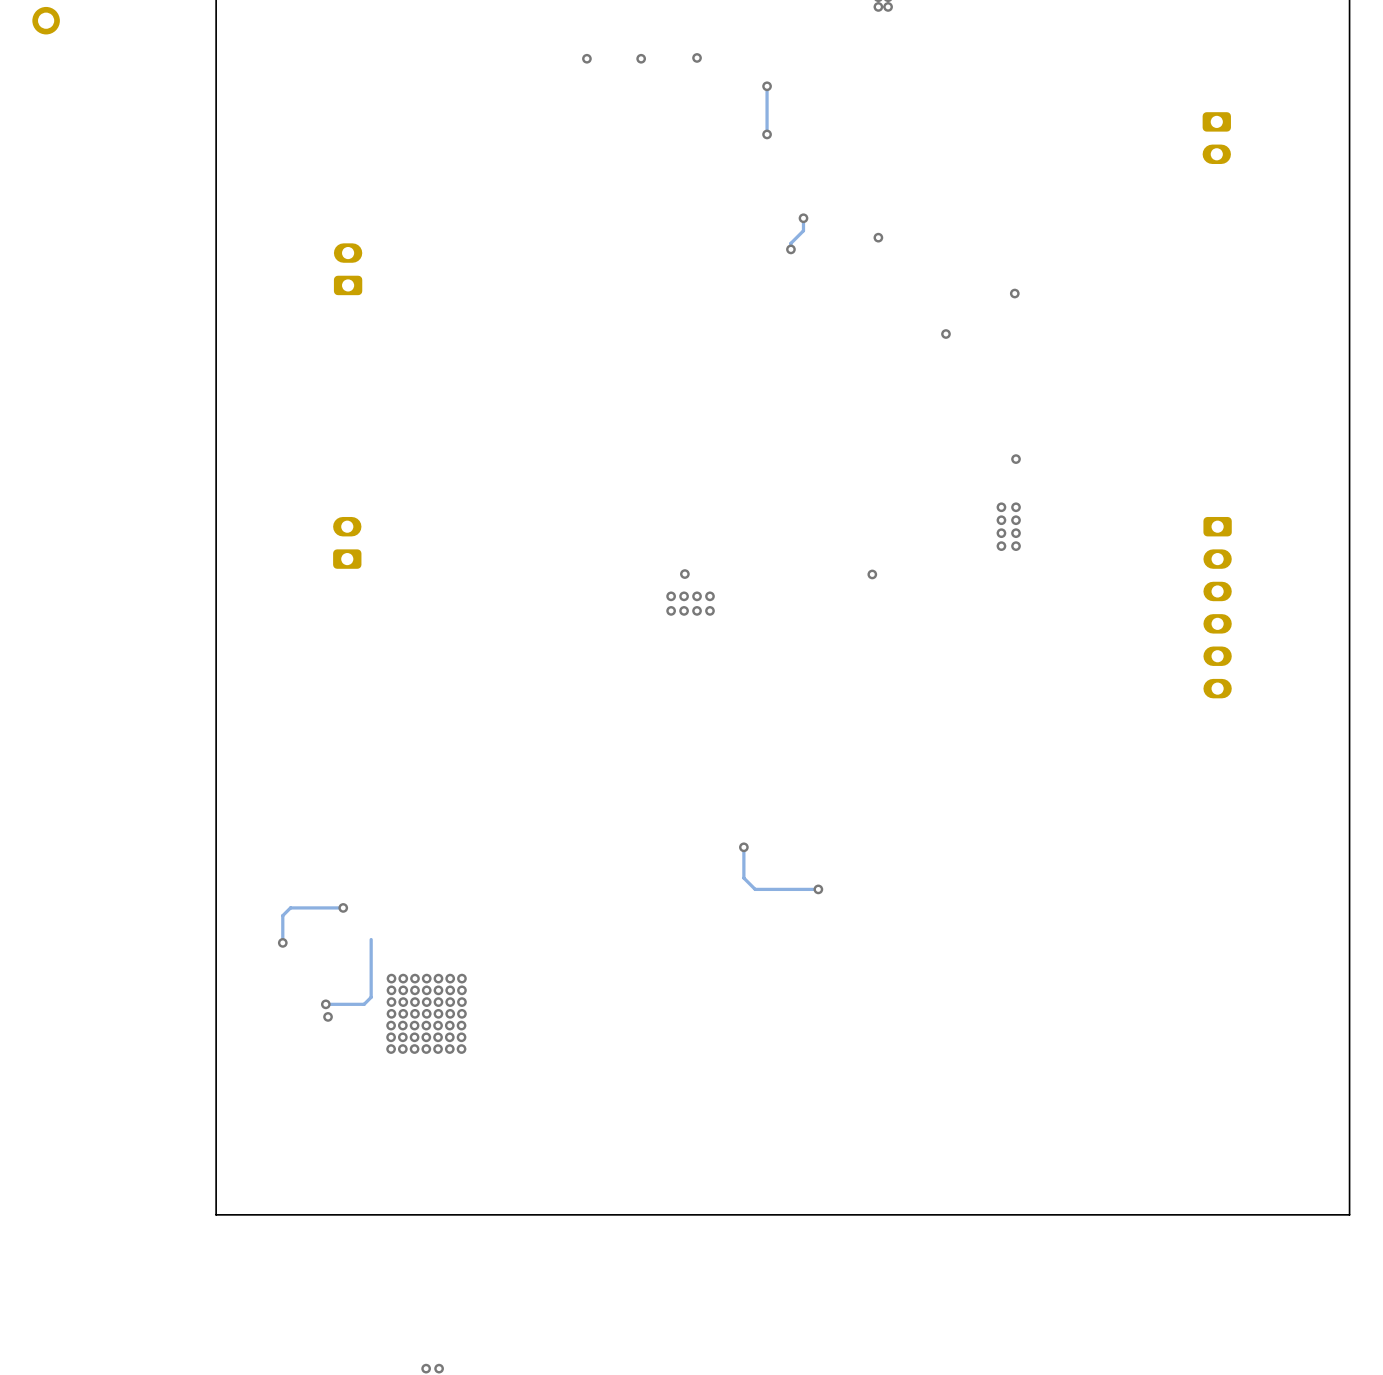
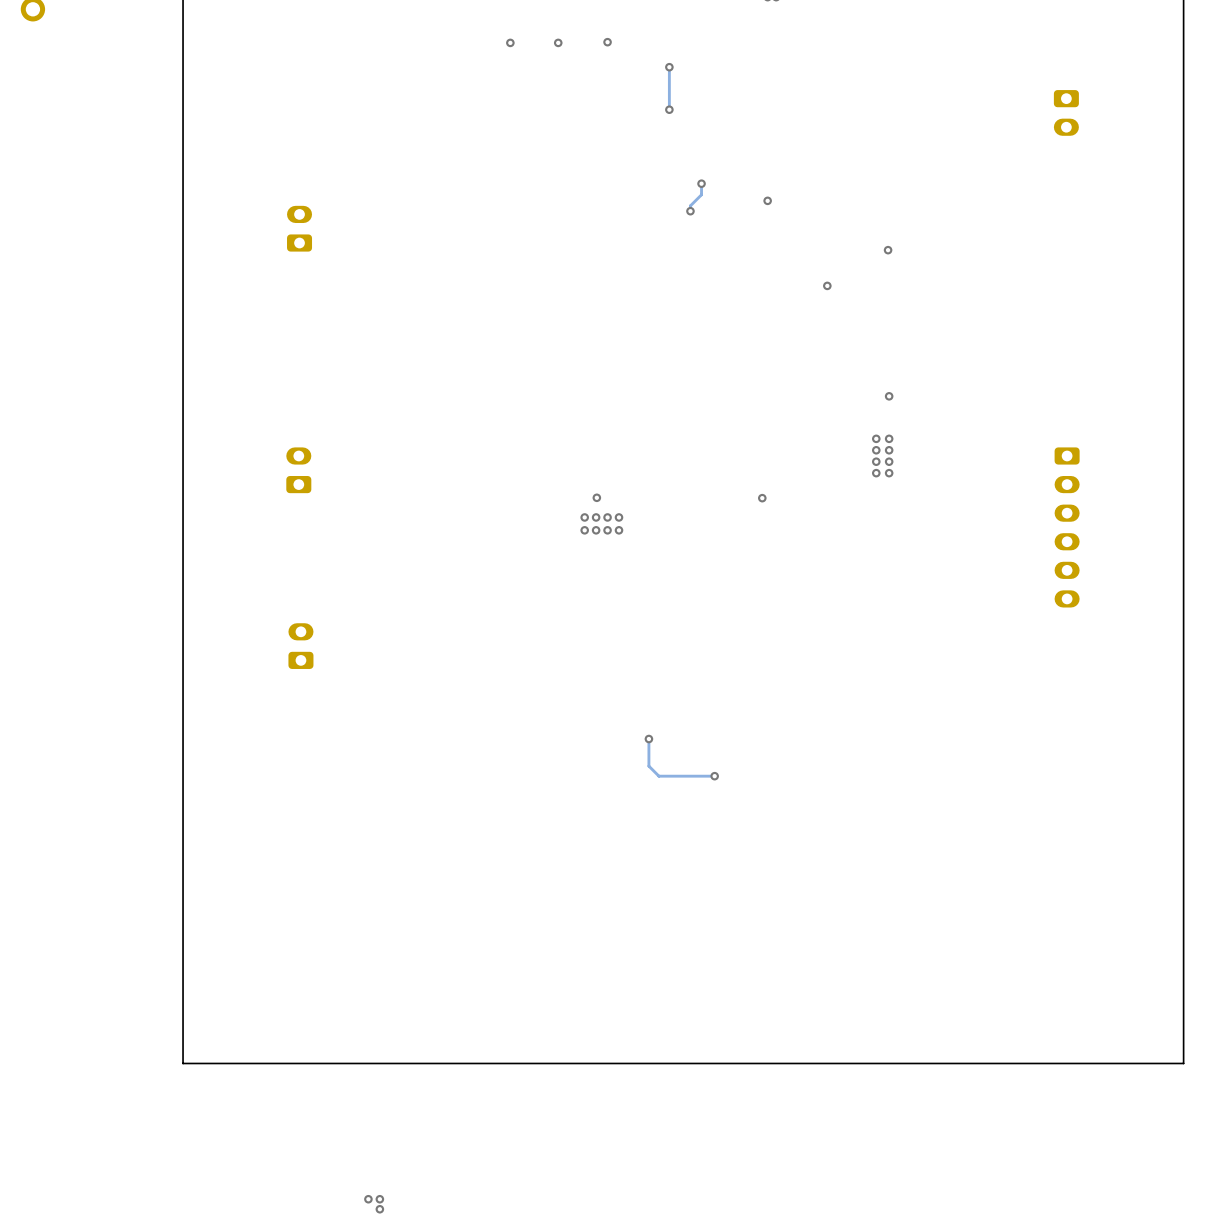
part: none -> (300, 646)
track: (343, 907) (290, 907) (282, 915) (282, 942) -> none
via: (343, 907) -> none
track: (371, 939) (371, 997) (364, 1004) (325, 1004) -> none
via: (282, 942) -> none
via: (391, 978) -> none
via: (403, 978) -> none
via: (414, 978) -> none
via: (426, 978) -> none
via: (438, 978) -> none
via: (450, 978) -> none
via: (461, 978) -> none
via: (391, 990) -> none
via: (403, 990) -> none
via: (414, 990) -> none
via: (426, 990) -> none
via: (438, 990) -> none
via: (450, 990) -> none
via: (461, 990) -> none
via: (391, 1002) -> none
via: (403, 1002) -> none
via: (414, 1002) -> none
via: (426, 1002) -> none
via: (438, 1002) -> none
via: (450, 1002) -> none
via: (461, 1002) -> none
via: (325, 1004) -> none
via: (391, 1013) -> none
via: (403, 1013) -> none
via: (414, 1013) -> none
via: (426, 1013) -> none
via: (438, 1013) -> none
via: (450, 1013) -> none
via: (461, 1013) -> none
via: (328, 1016) -> none
via: (391, 1025) -> none
via: (402, 1025) -> none
via: (414, 1025) -> none
via: (426, 1025) -> none
via: (438, 1025) -> none
via: (449, 1025) -> none
via: (461, 1025) -> none
via: (391, 1037) -> none
via: (402, 1037) -> none
via: (414, 1037) -> none
via: (426, 1037) -> none
via: (438, 1037) -> none
via: (449, 1037) -> none
via: (461, 1037) -> none
via: (391, 1049) -> none
via: (402, 1049) -> none
via: (414, 1049) -> none
via: (426, 1049) -> none
via: (438, 1049) -> none
via: (449, 1049) -> none
via: (461, 1049) -> none

